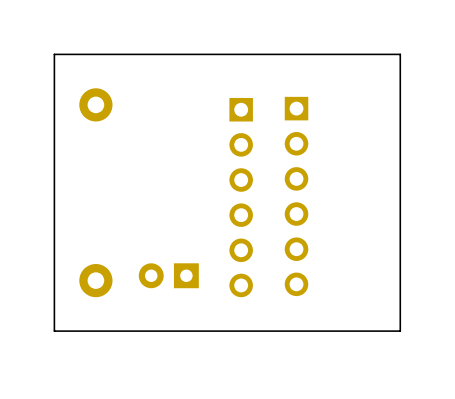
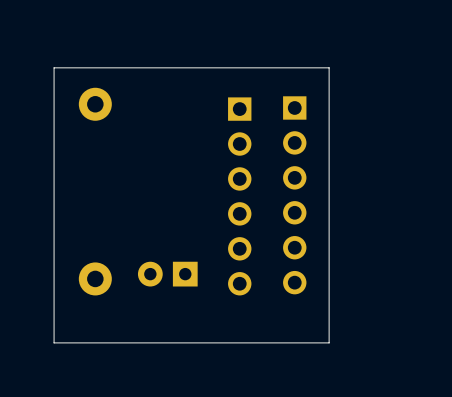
board edge: (54, 68) (54, 54) (400, 54) (400, 331) (54, 331) -> (54, 67) (329, 67) (329, 342) (54, 342) (54, 329)

